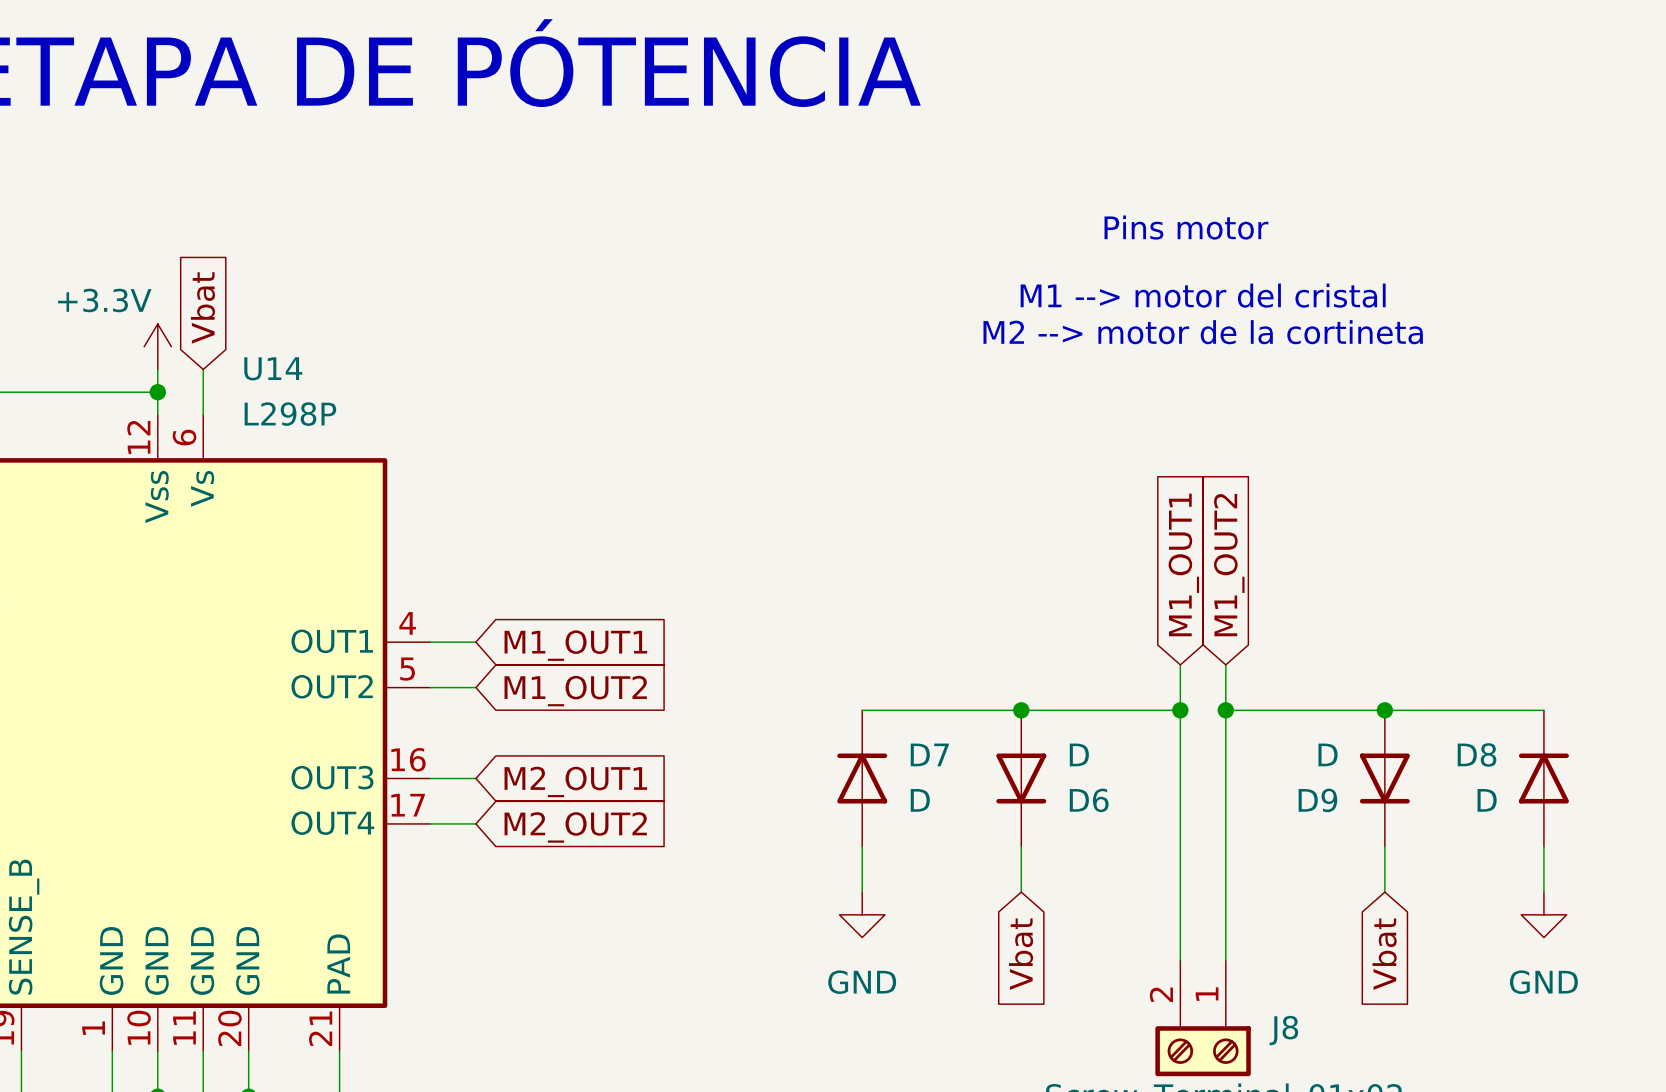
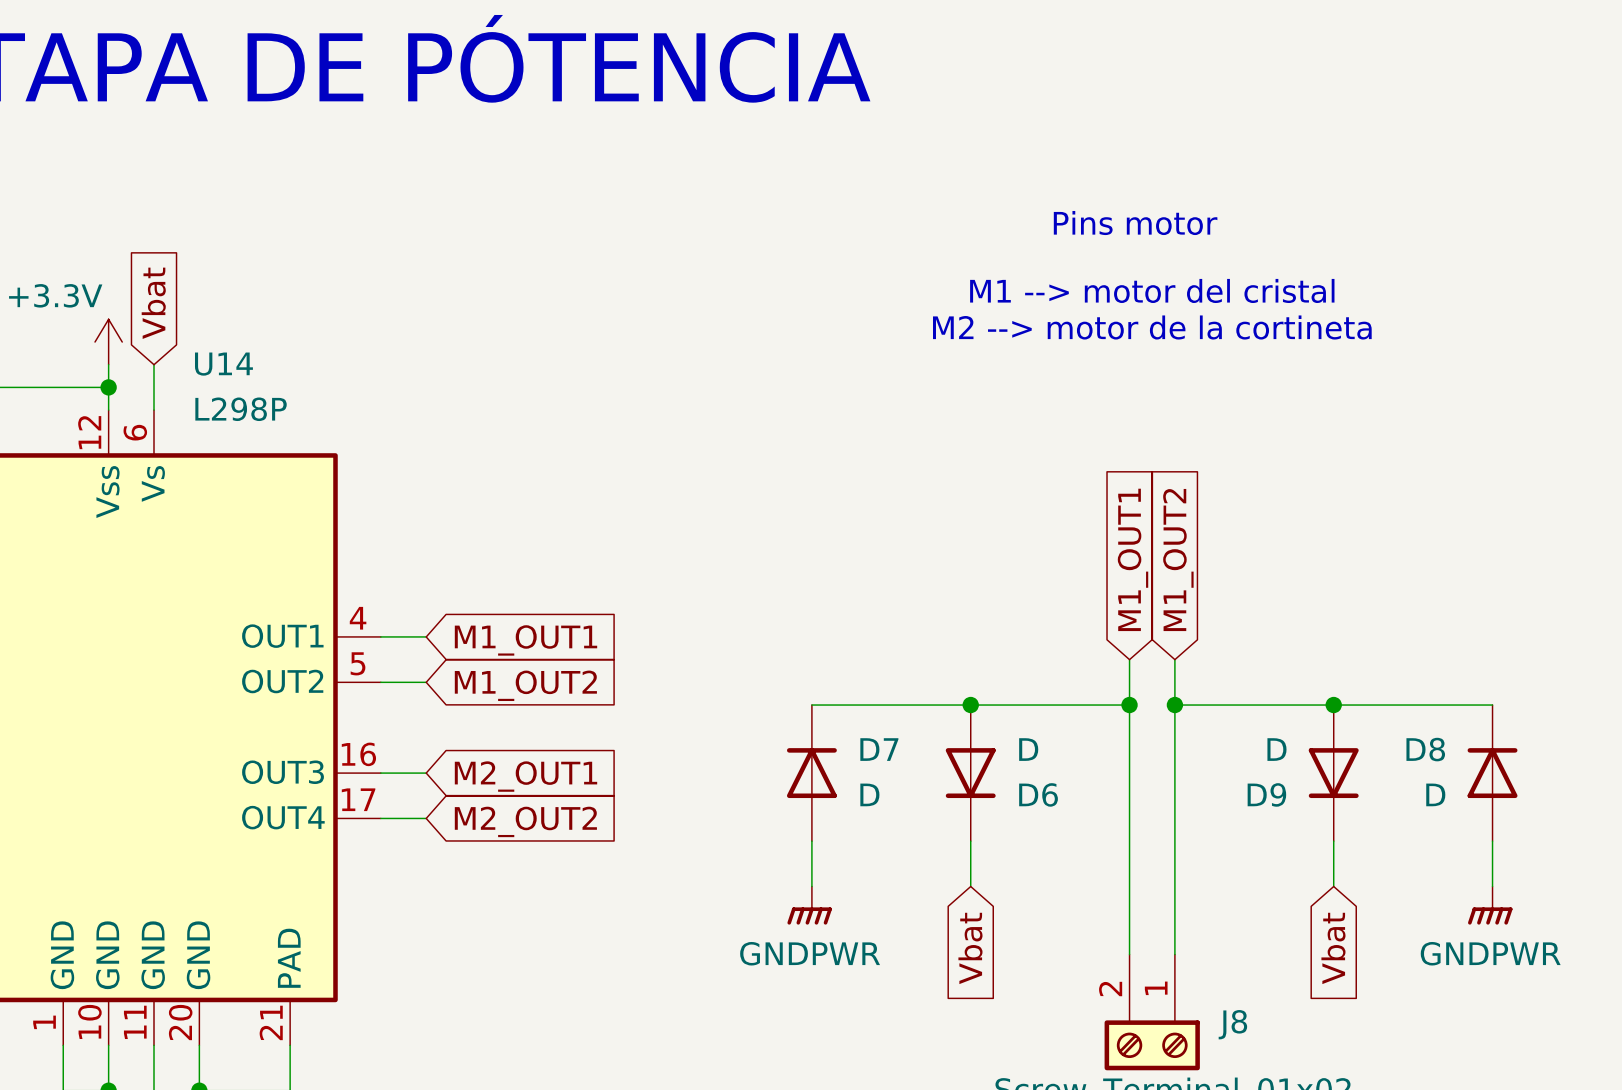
power symbol: GND (862, 914) -> GNDPWR (809, 905)
power symbol: GND (1543, 914) -> GNDPWR (1490, 905)

